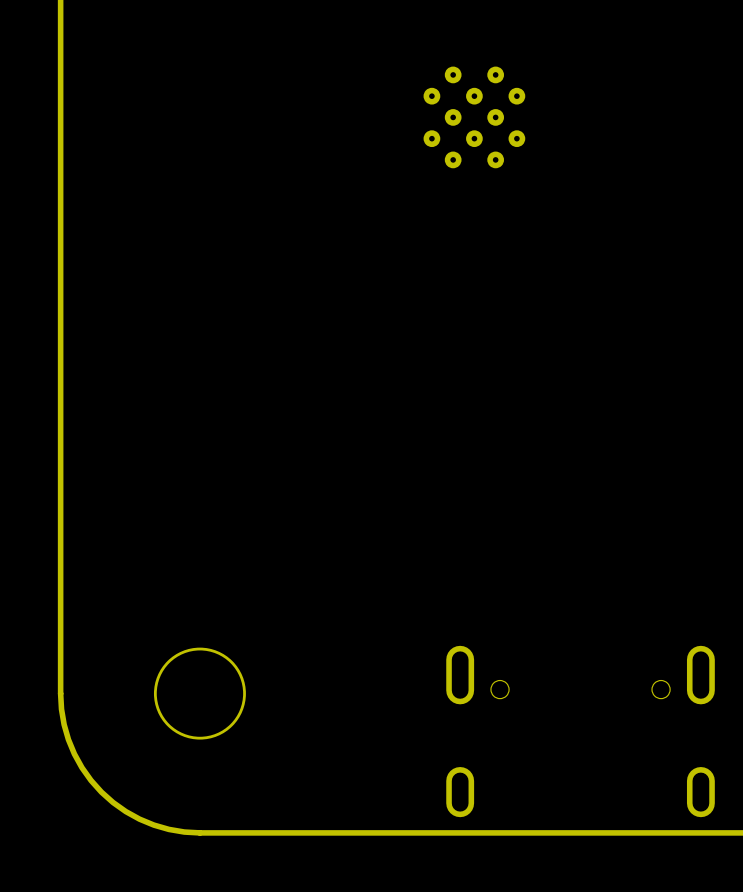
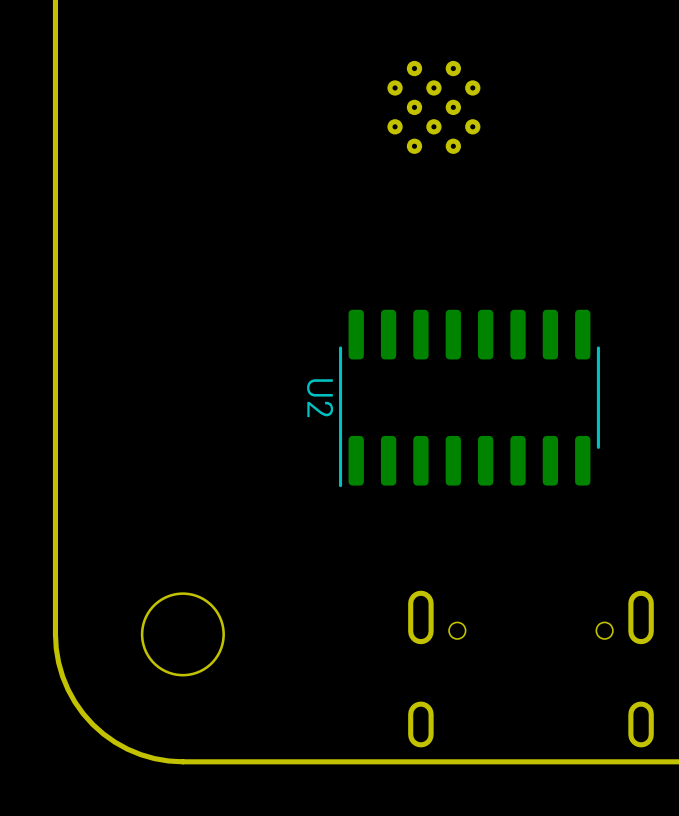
U2: none -> (469, 398)

